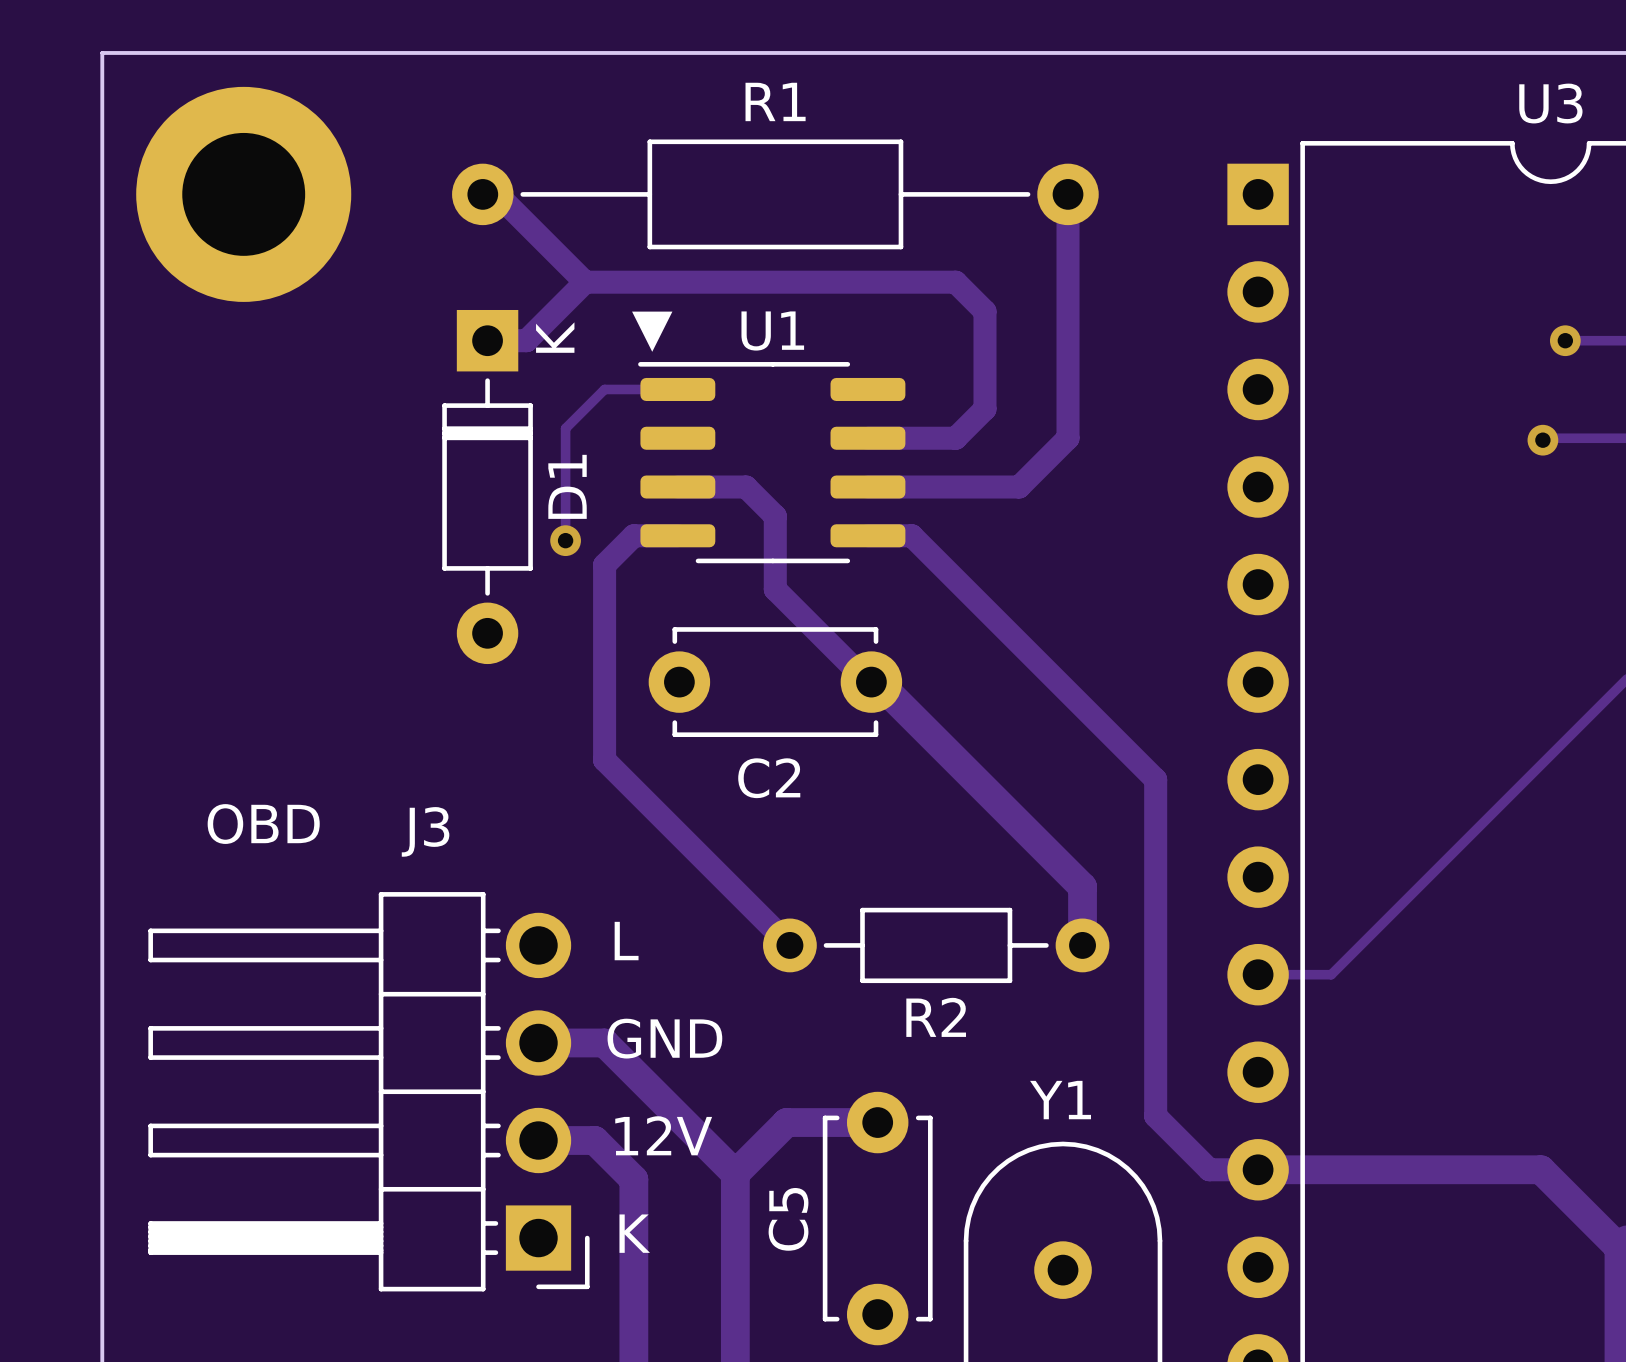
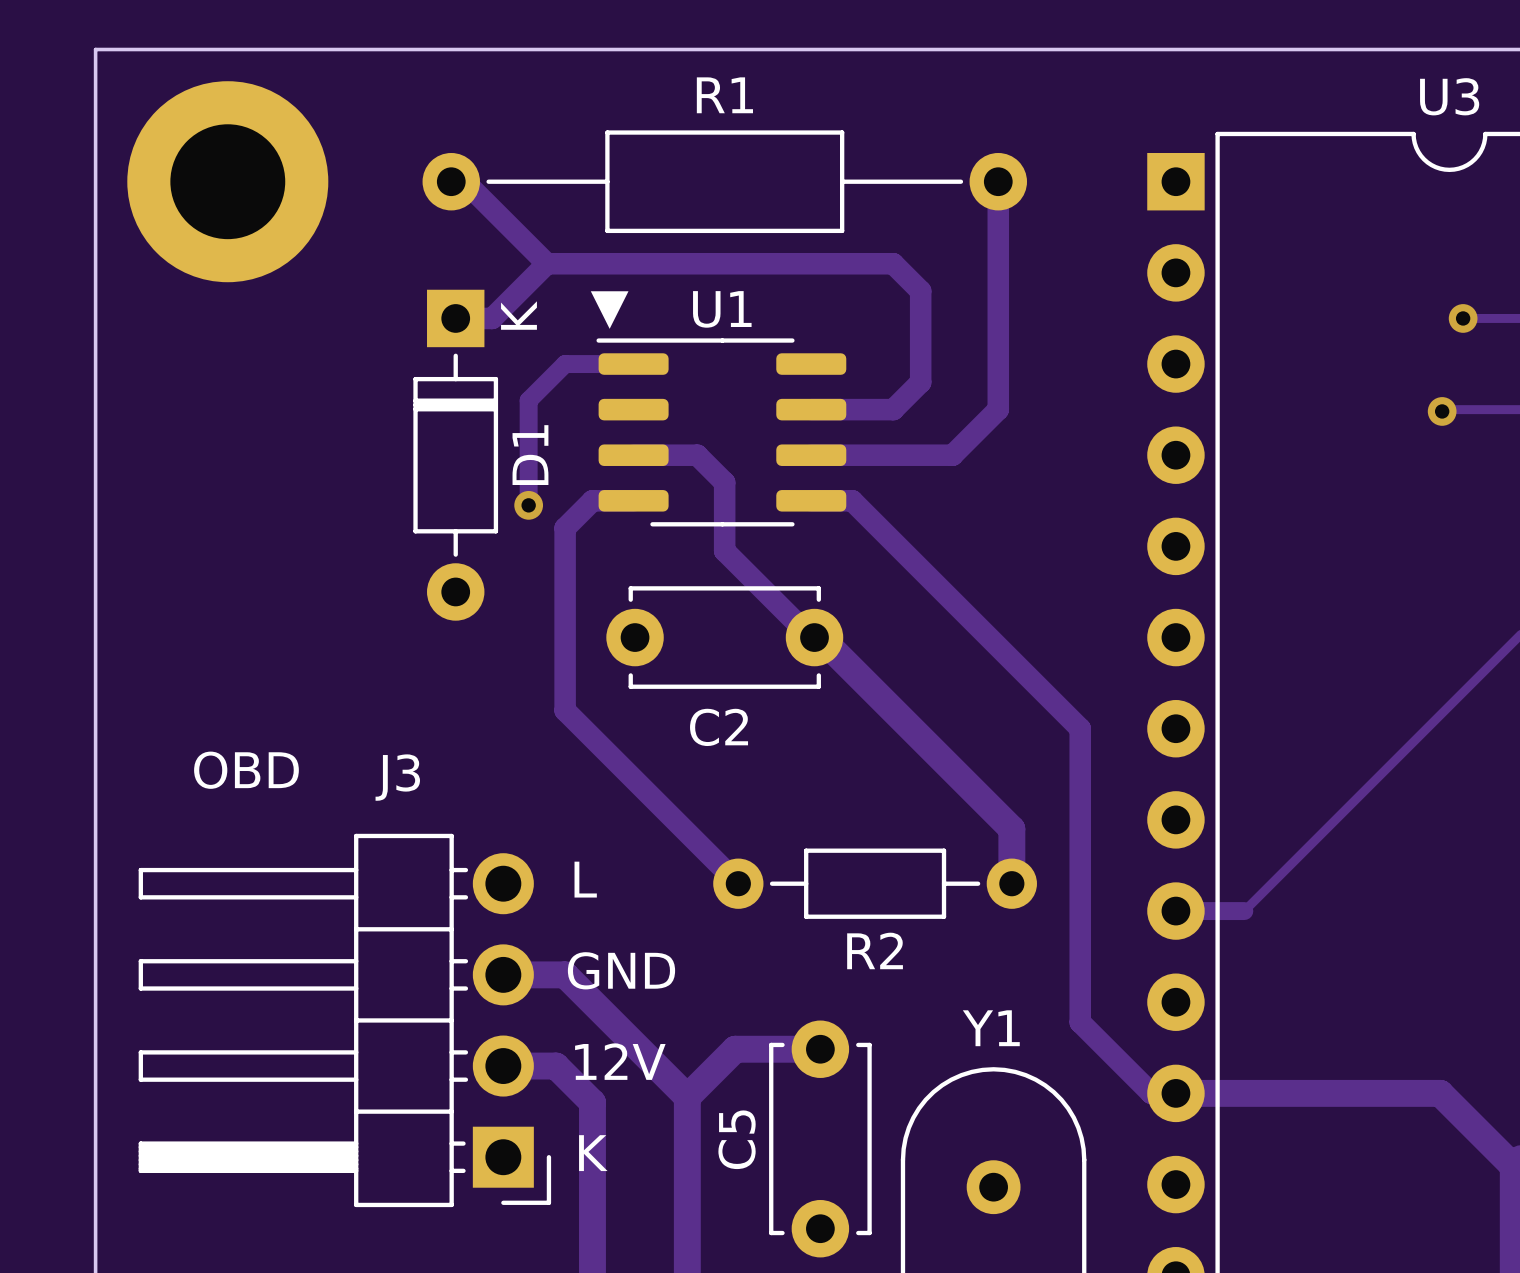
track width: thin (677, 389) (604, 389) (565, 428) (565, 540) -> thick (633, 364) (565, 364) (528, 400) (528, 505)
track width: thin (1258, 974) (1331, 974) -> thick (1175, 911) (1244, 911)
track: (1155, 1093) (1155, 1116) (1209, 1169) (1231, 1169) -> (1080, 1022) (1151, 1093)

